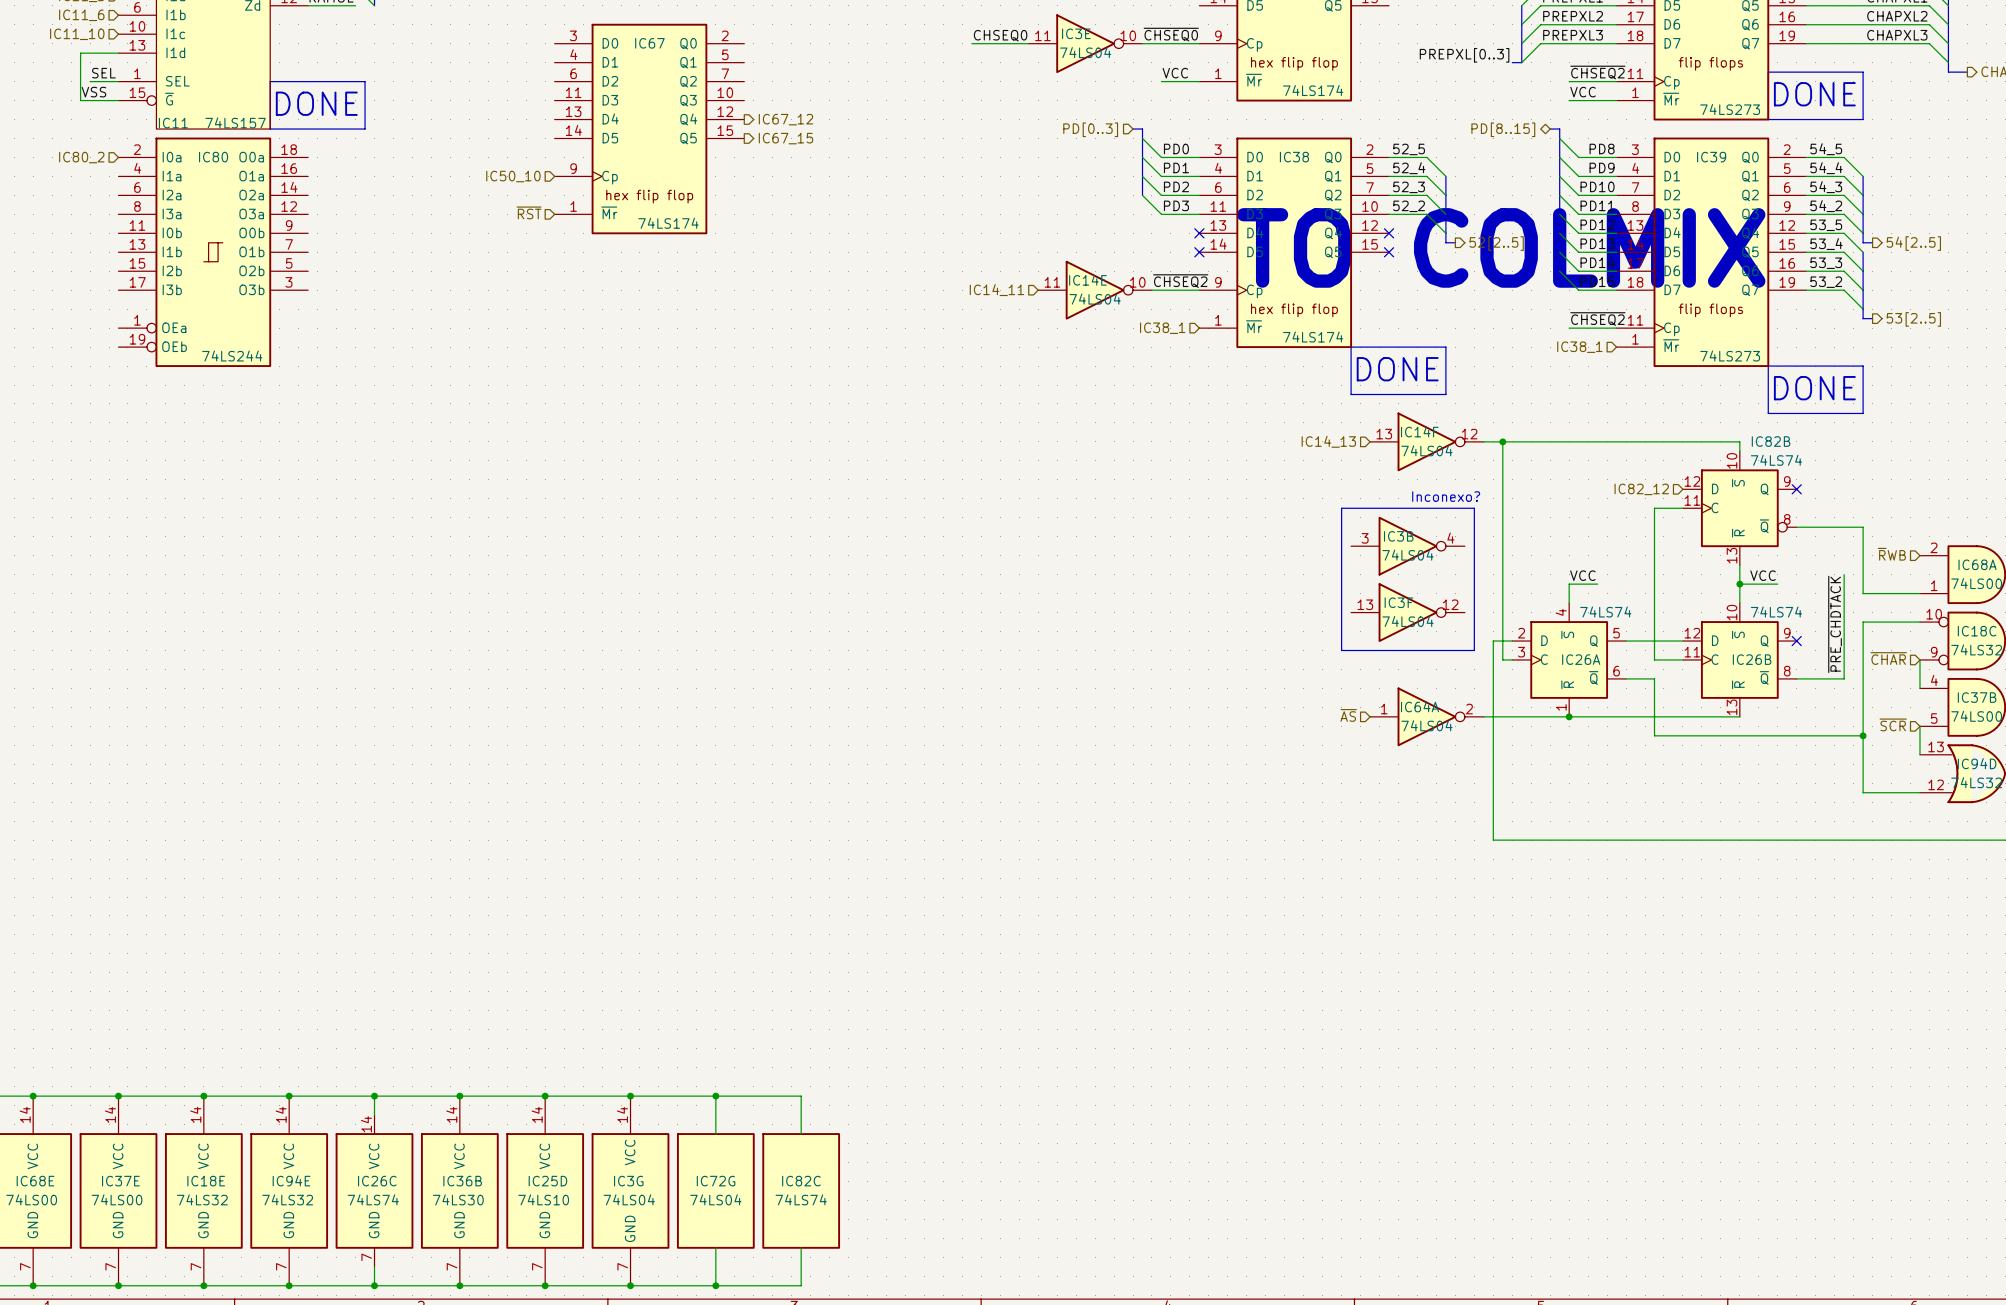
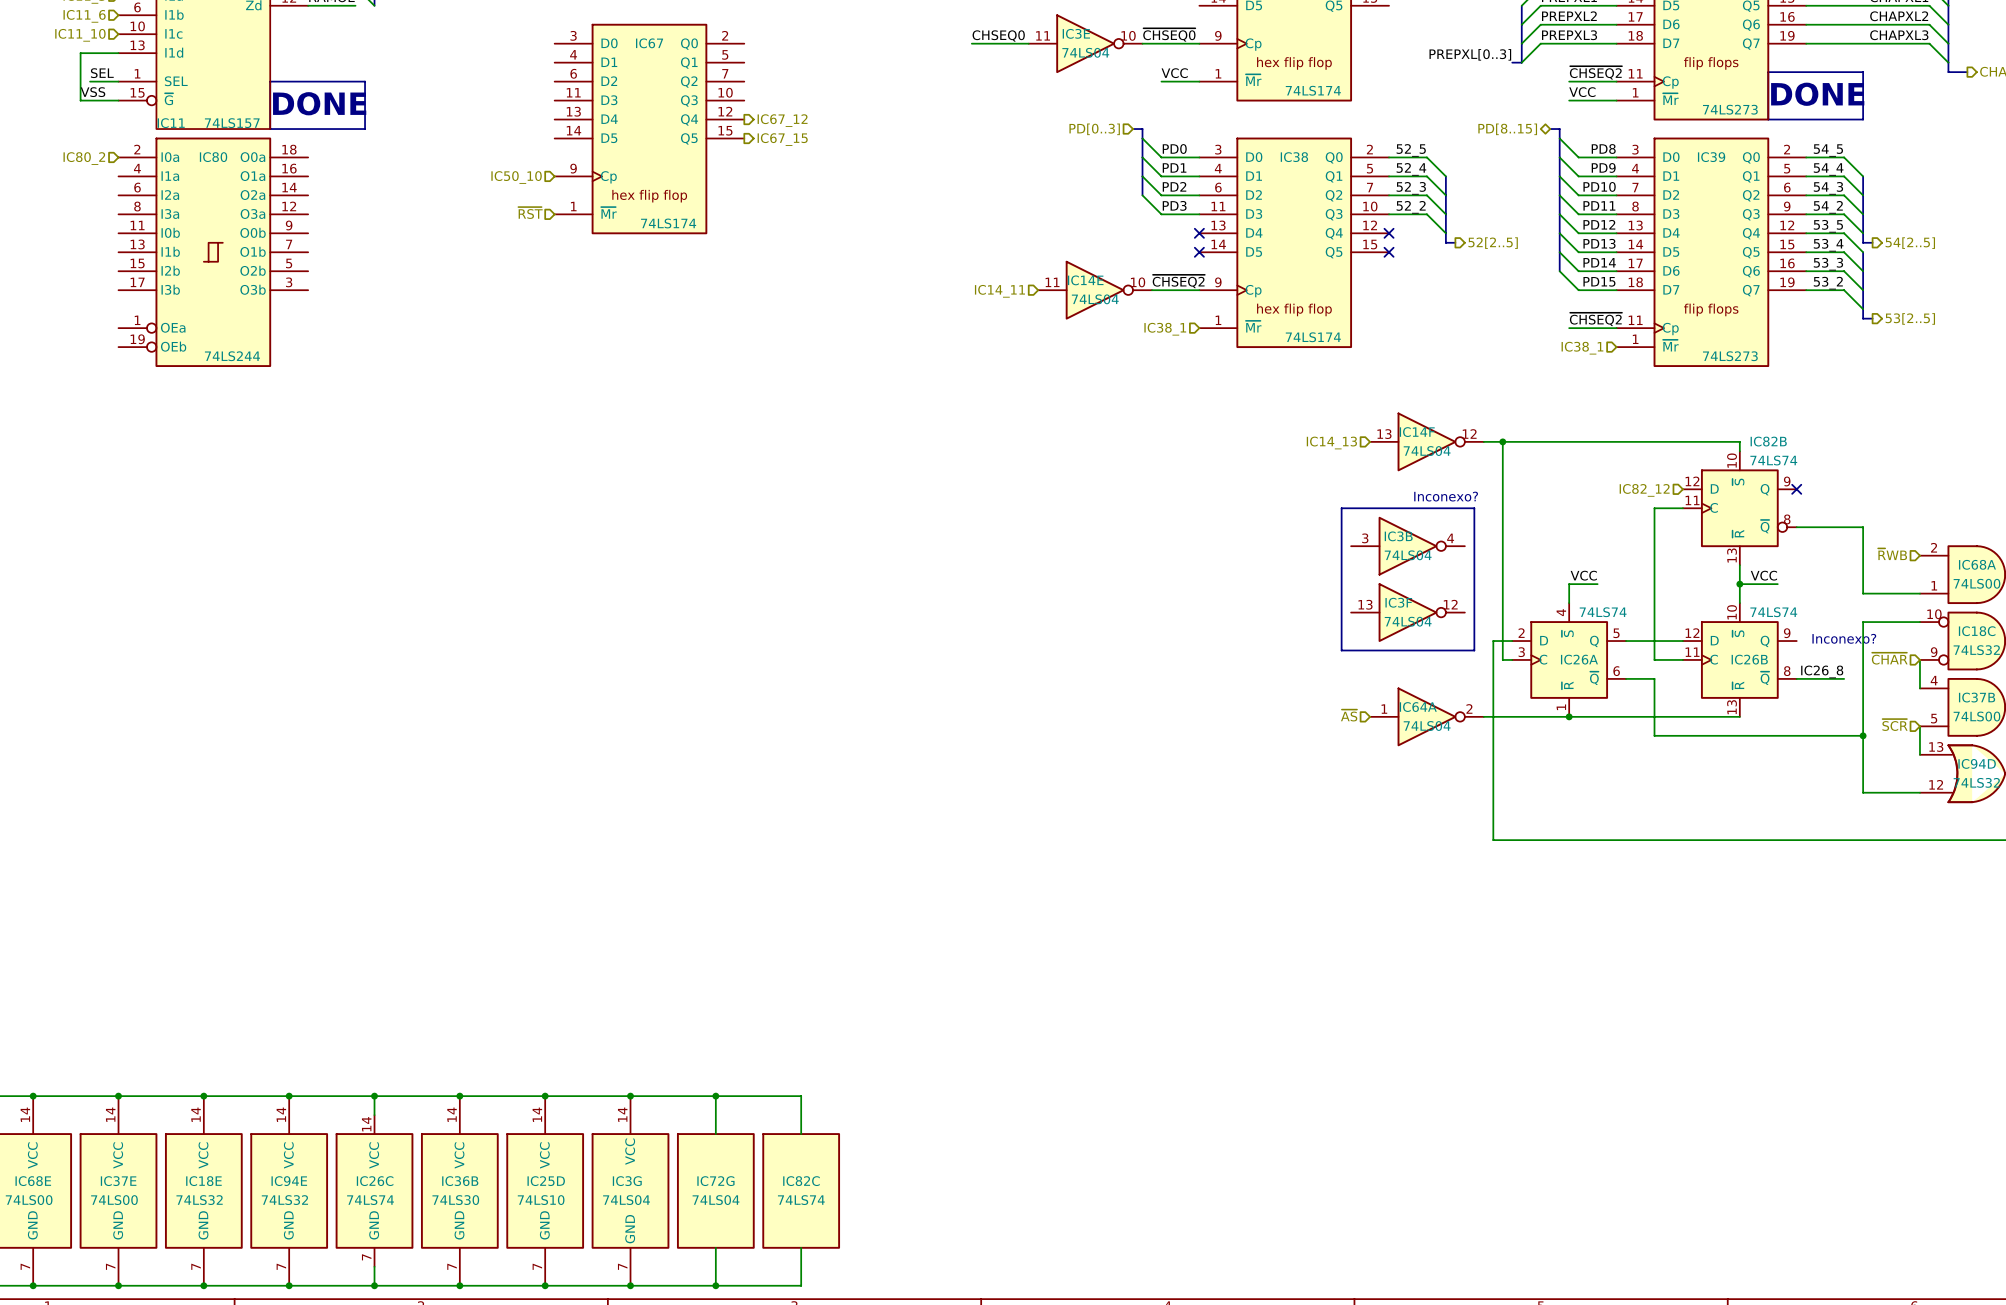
text: TO COLMIX (1501, 247) -> none
line: (1351, 347) (1445, 347) (1445, 394) (1351, 394) (1351, 347) -> none
line: (1768, 366) (1863, 366) (1863, 413) (1768, 413) (1768, 366) -> none
text: DONE (1397, 369) -> none
text: DONE (1814, 388) -> none
wire: (1844, 574) (1844, 678) -> none
label: ~{PRE_CHDTACK} (1835, 624) -> none
text: none -> Inconexo? (1844, 638)
no-connect mark: (1796, 641) -> none
label: none -> IC26_8 (1822, 671)

